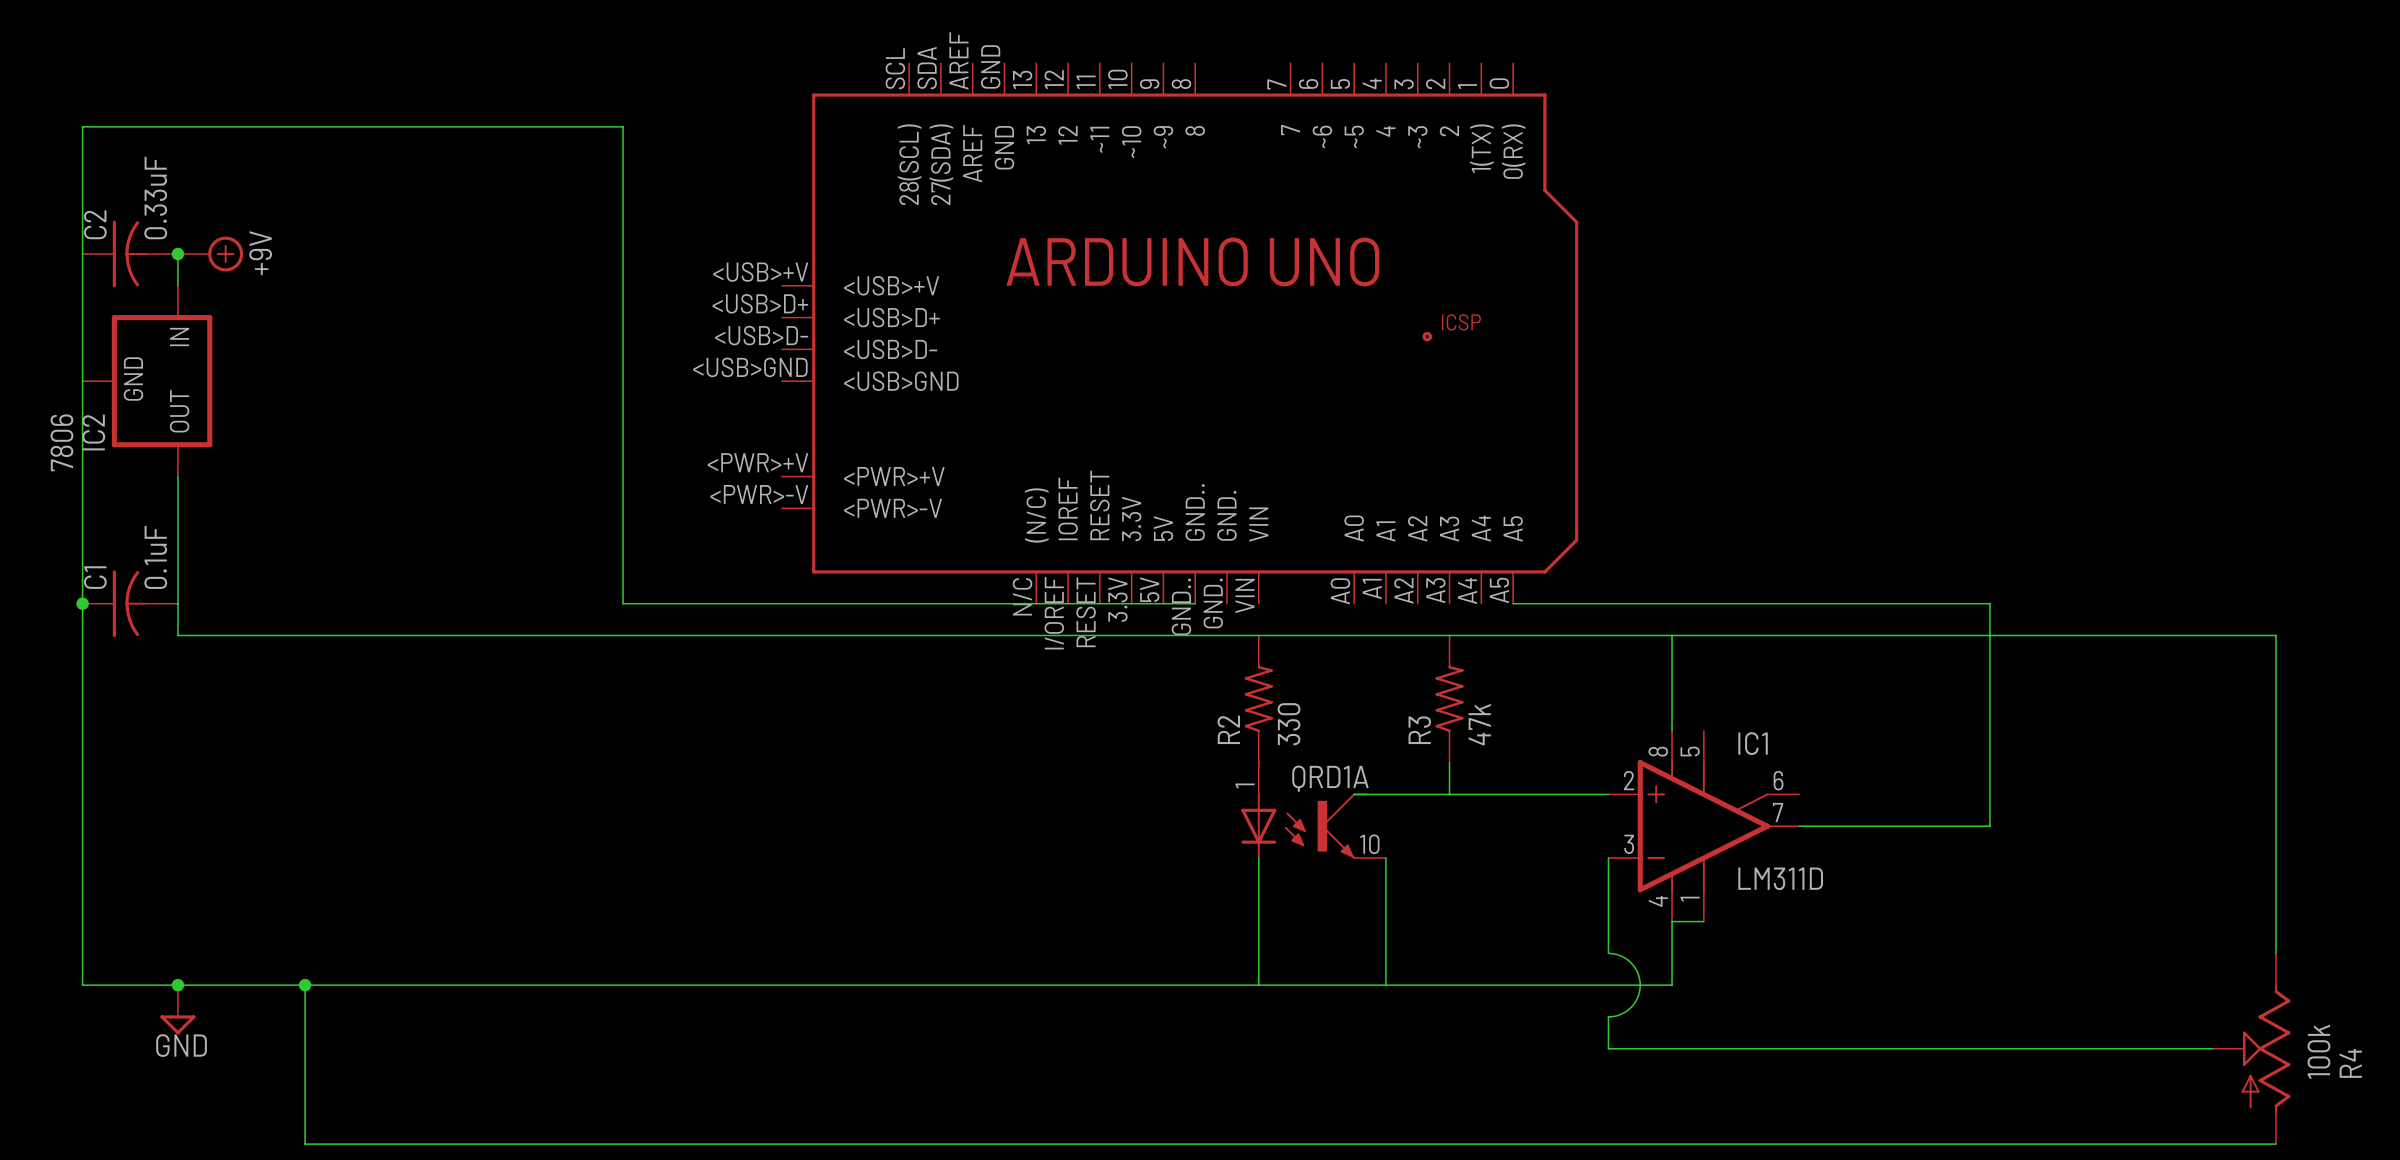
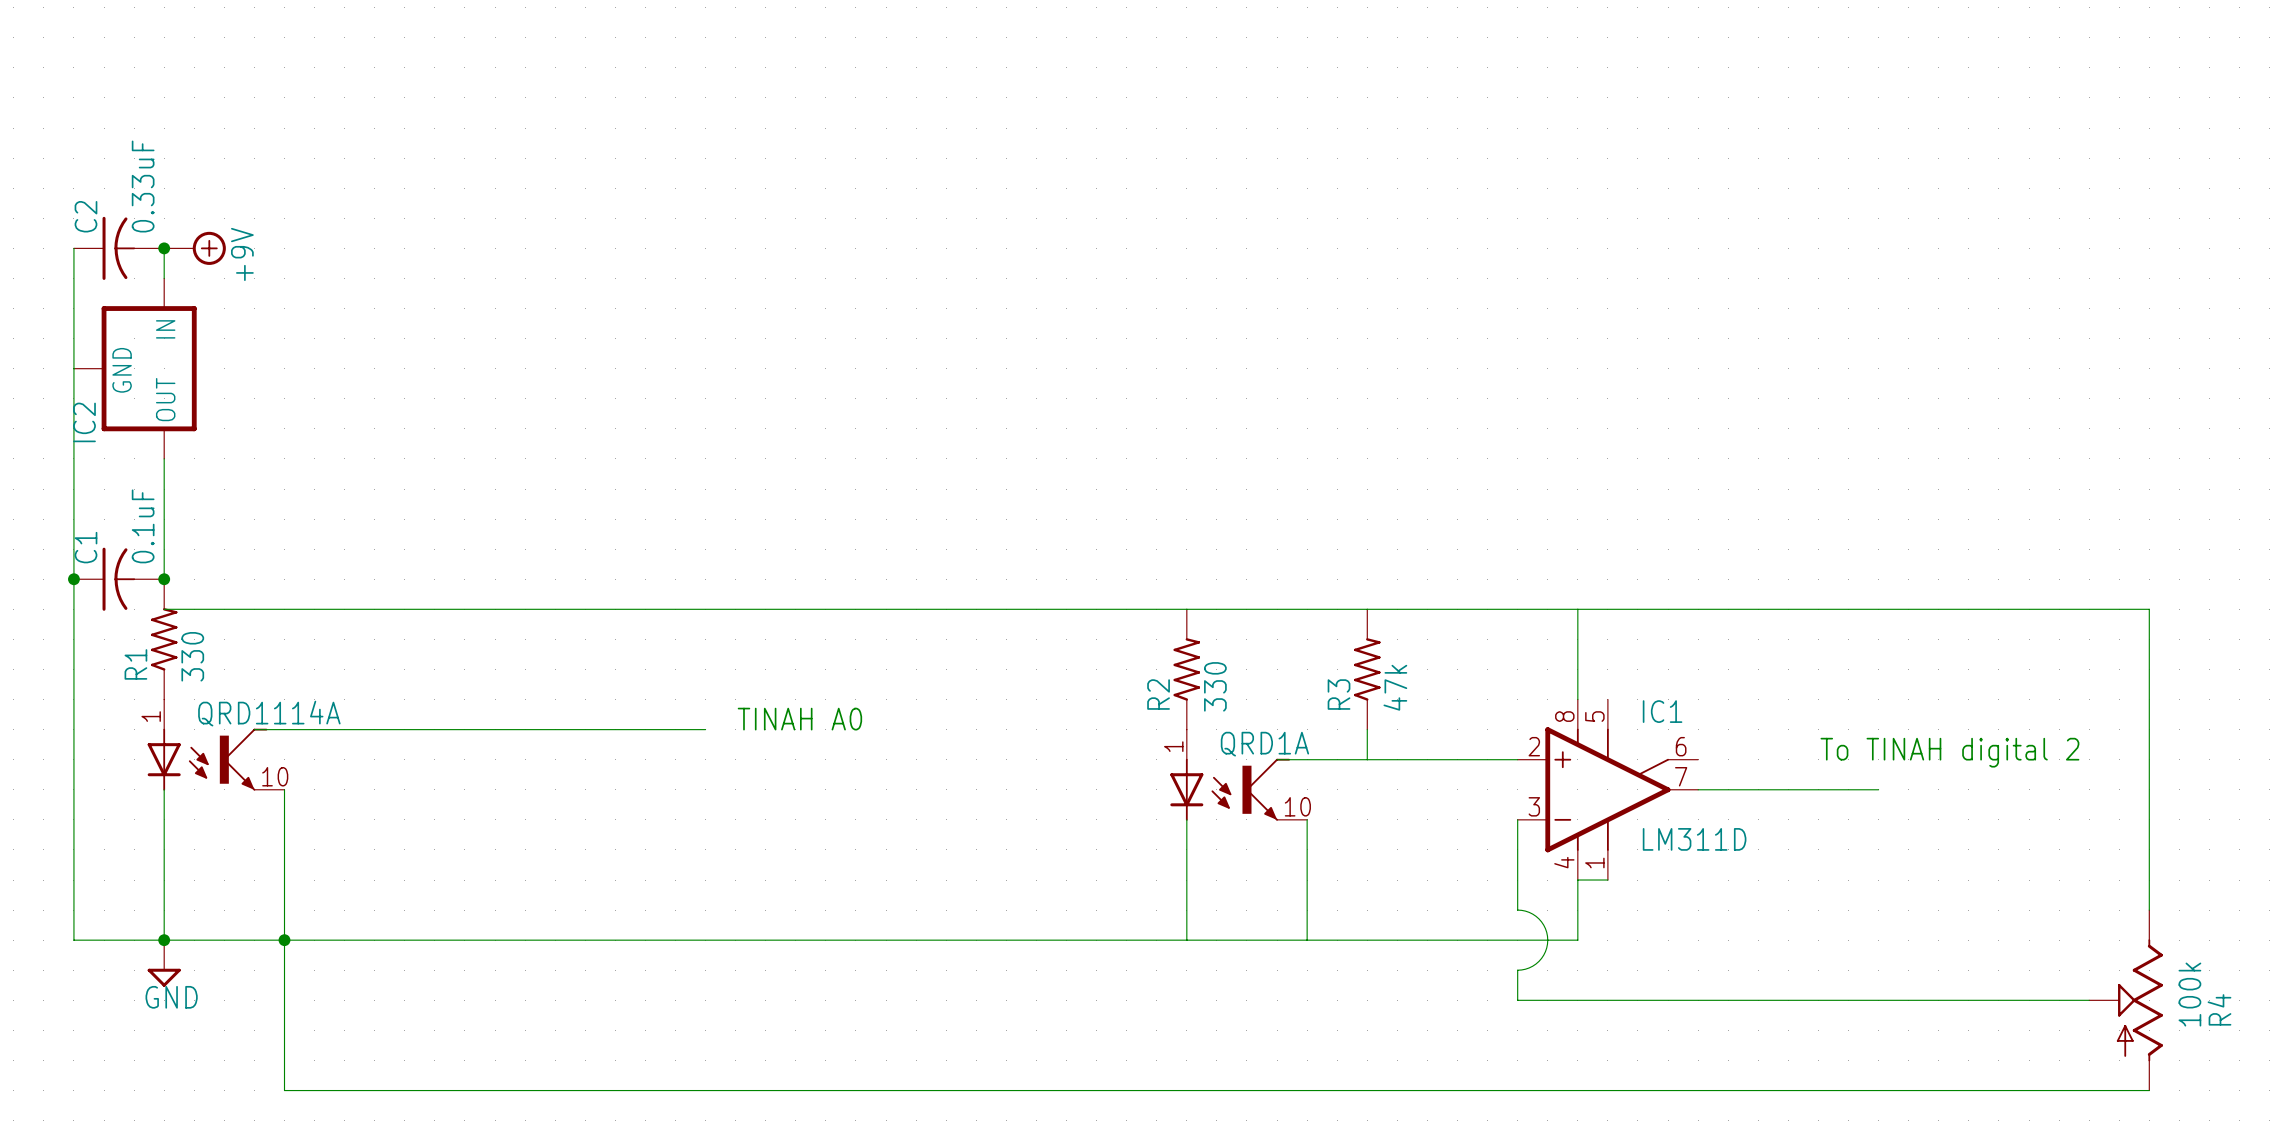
wire: (82, 254) (82, 126) (623, 126) (623, 603) (1195, 603) -> none
part: (1180, 333) -> none
IC2 value: 7806 (61, 442) -> none
junction: none -> (164, 579)
wire: (1513, 603) (1989, 603) (1989, 826) -> none
R1: none -> 330 (164, 639)
text: none -> TINAH A0 (799, 719)
wire: none -> (254, 729) (705, 729)
QRD1114A: none -> (216, 745)
text: none -> To TINAH digital 2 (1949, 752)
wire: none -> (164, 789) (164, 940)
wire: none -> (284, 789) (284, 940)

